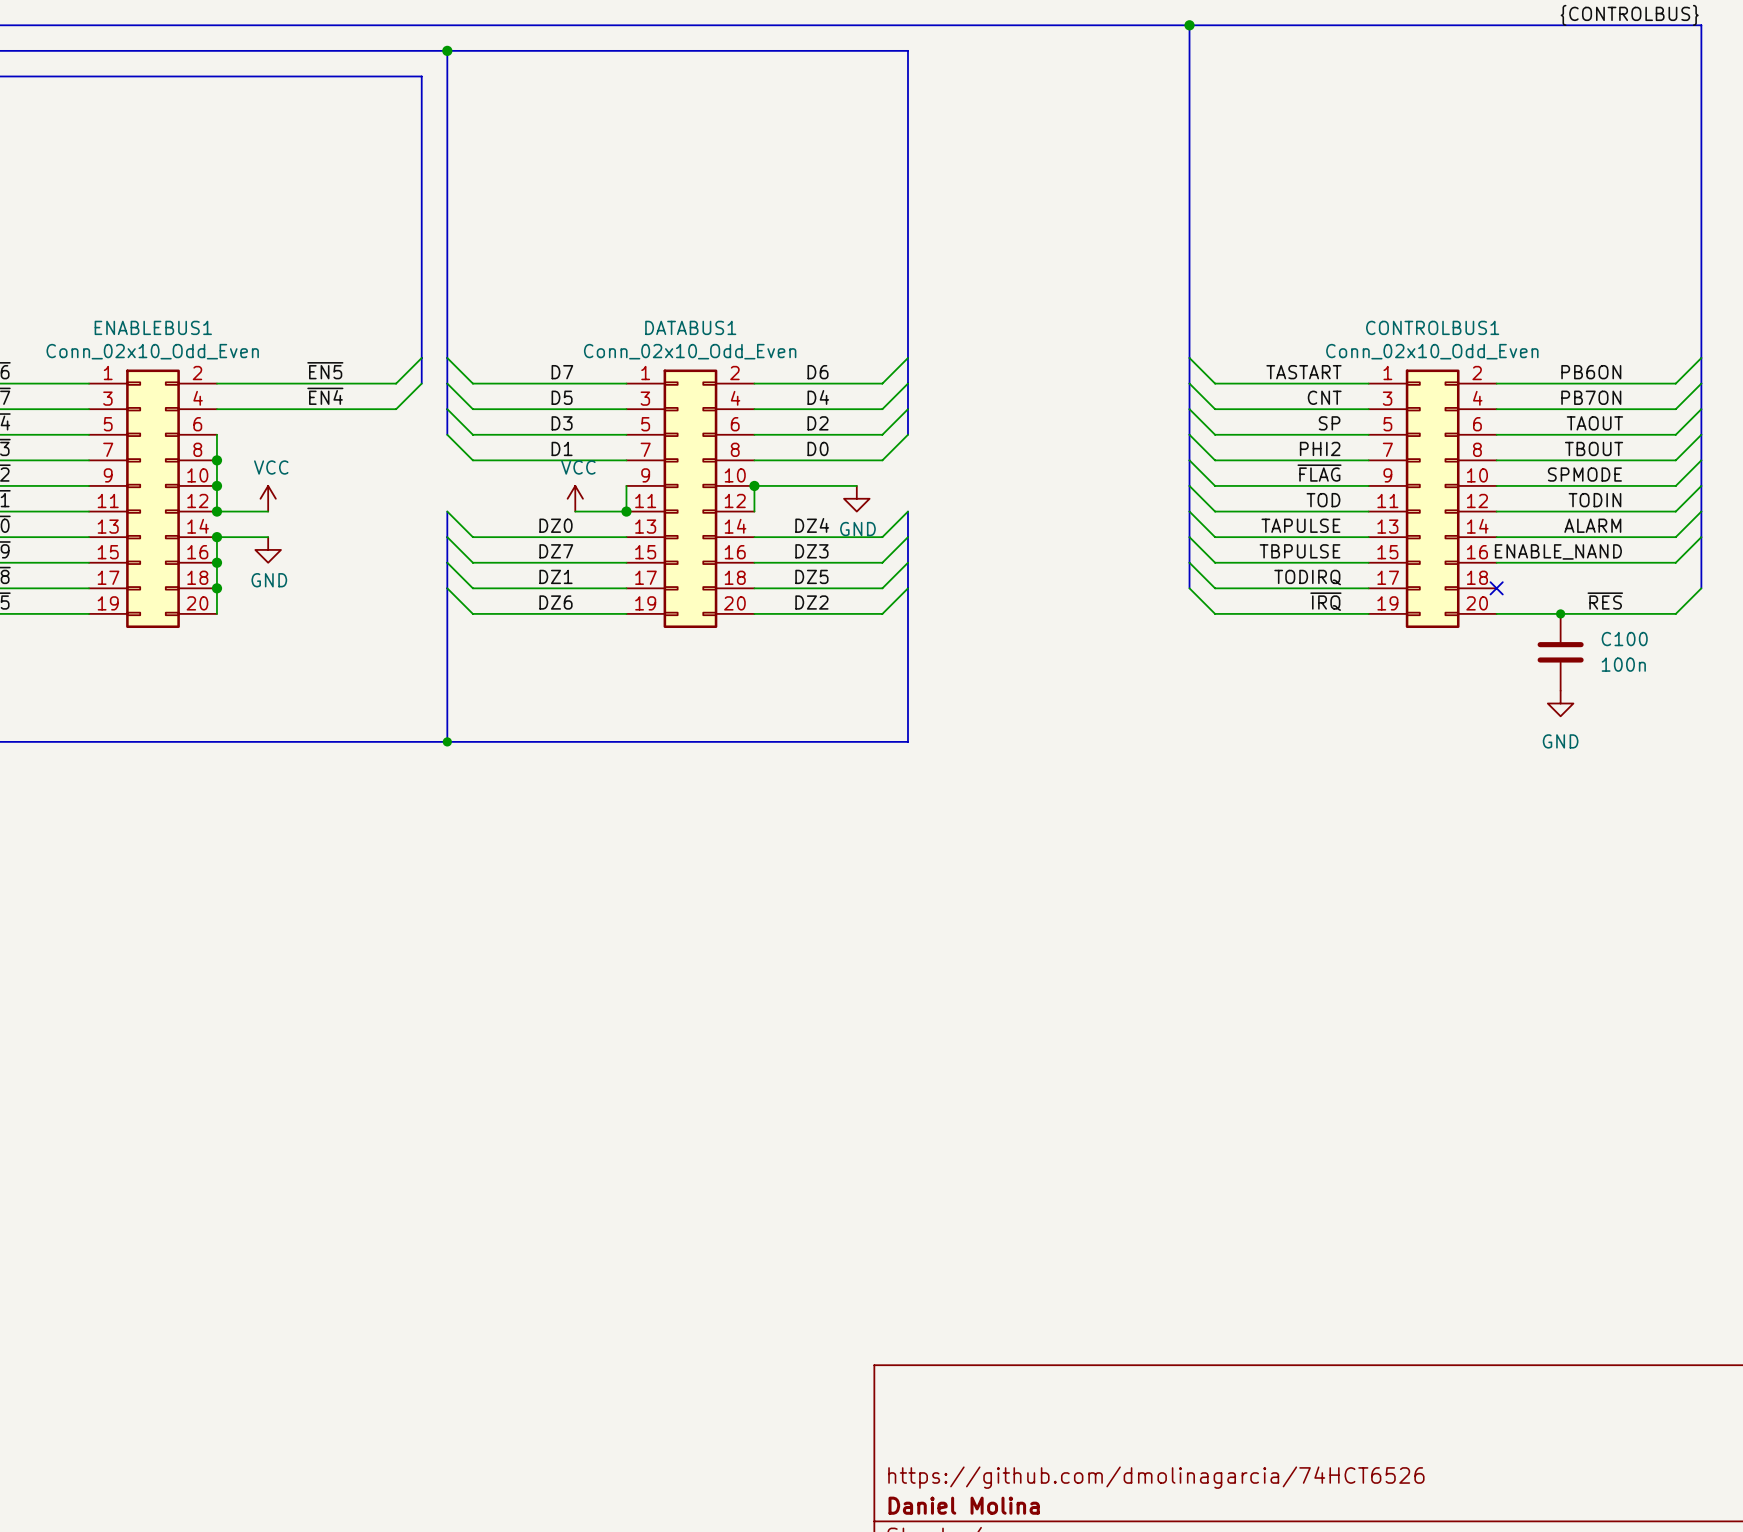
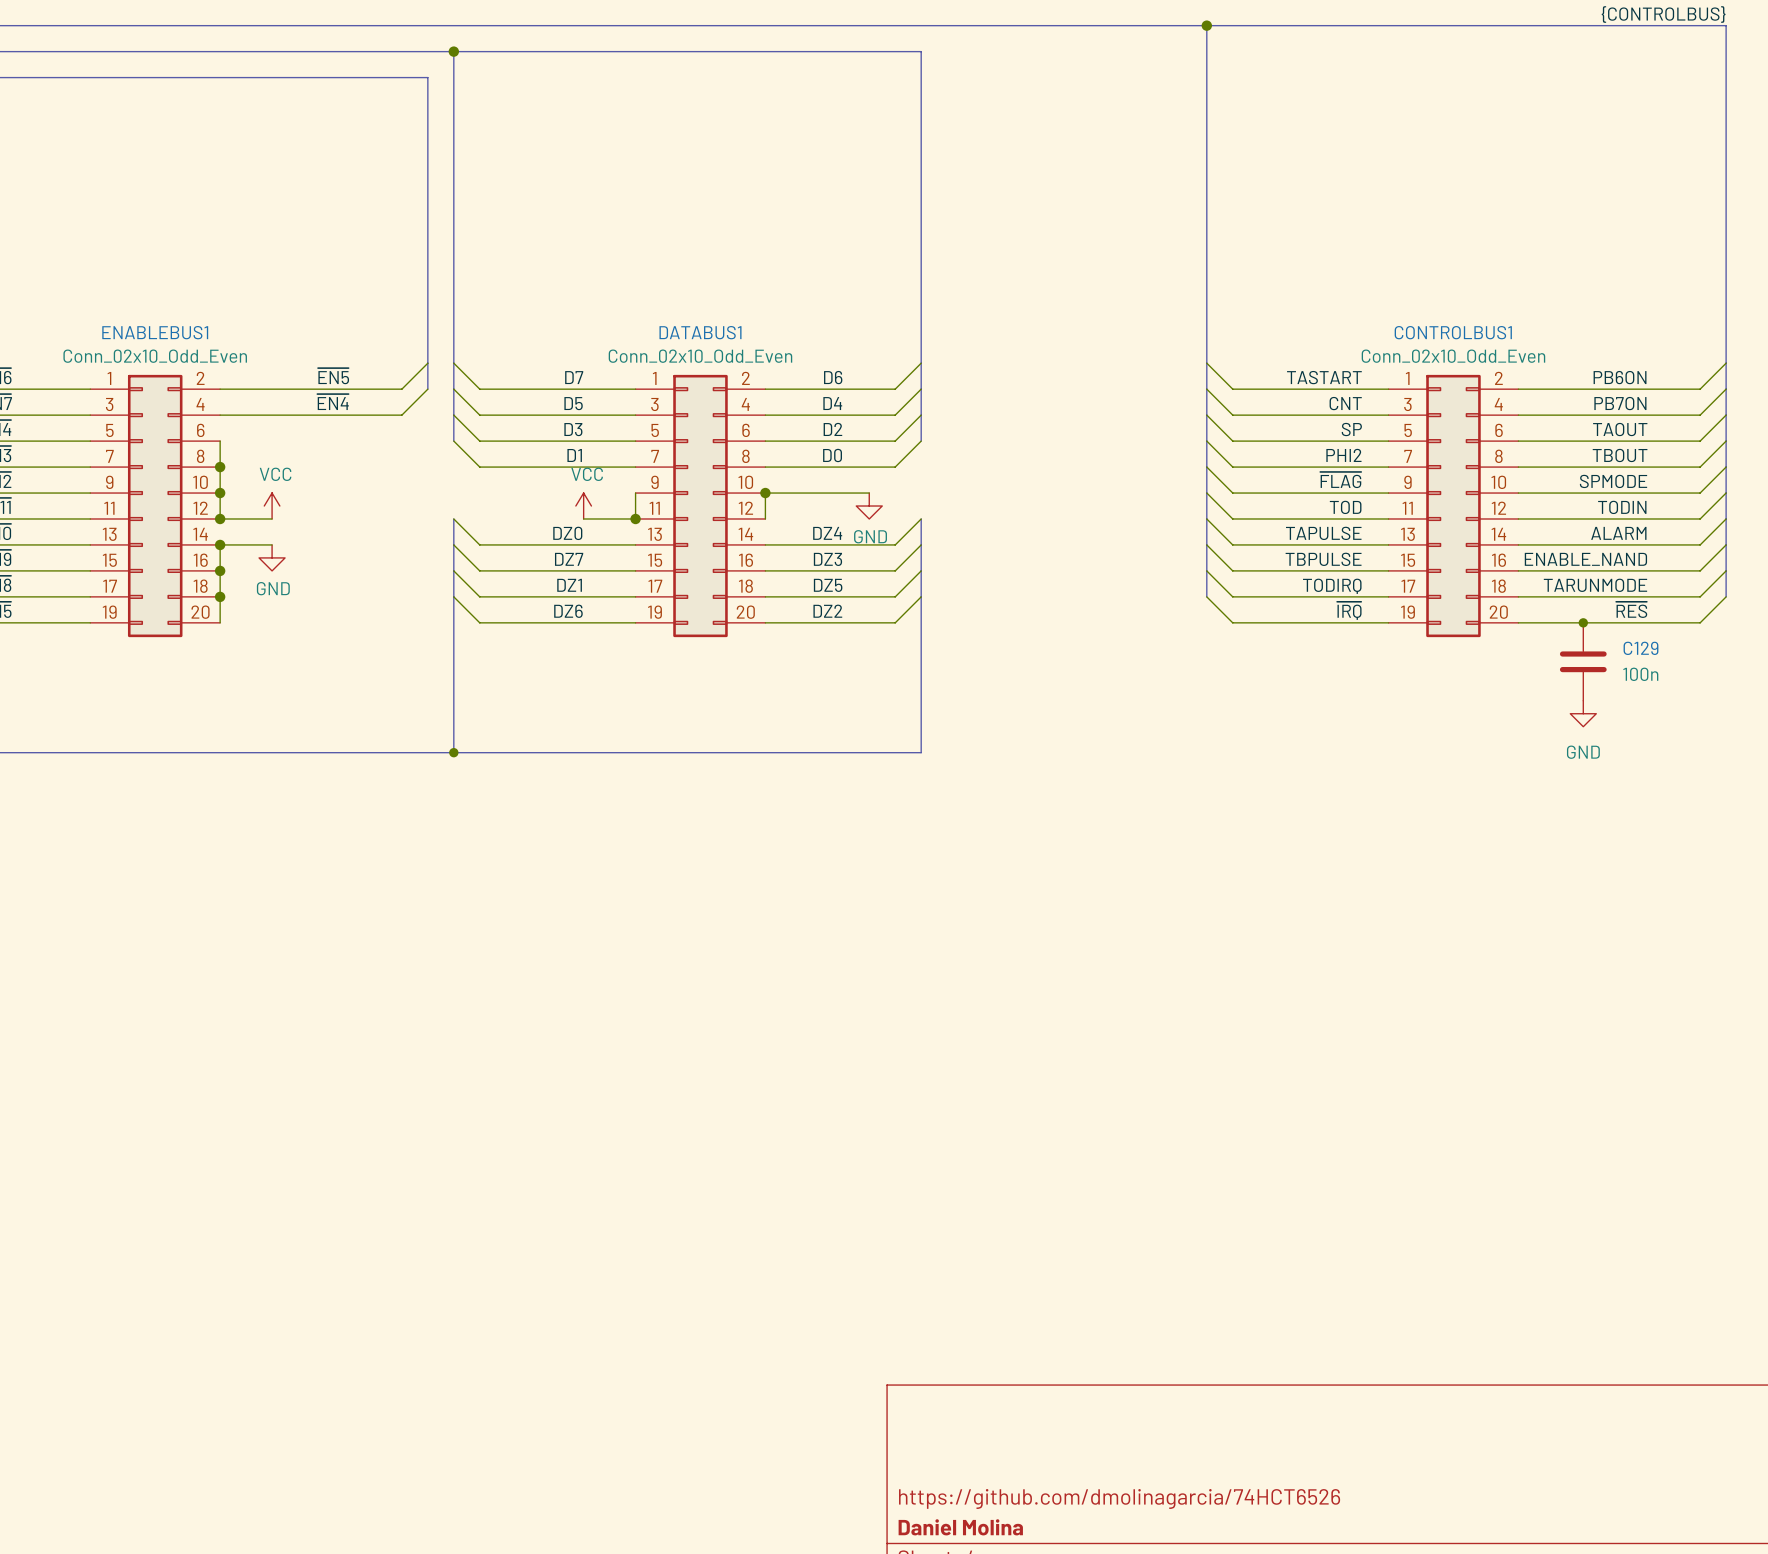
wire: none -> (1726, 570) (1700, 596) (1518, 596)
label: none -> TARUNMODE (1595, 585)
no-connect mark: (1496, 588) -> none
C100 name: C100 (1624, 639) -> C129 (1640, 648)

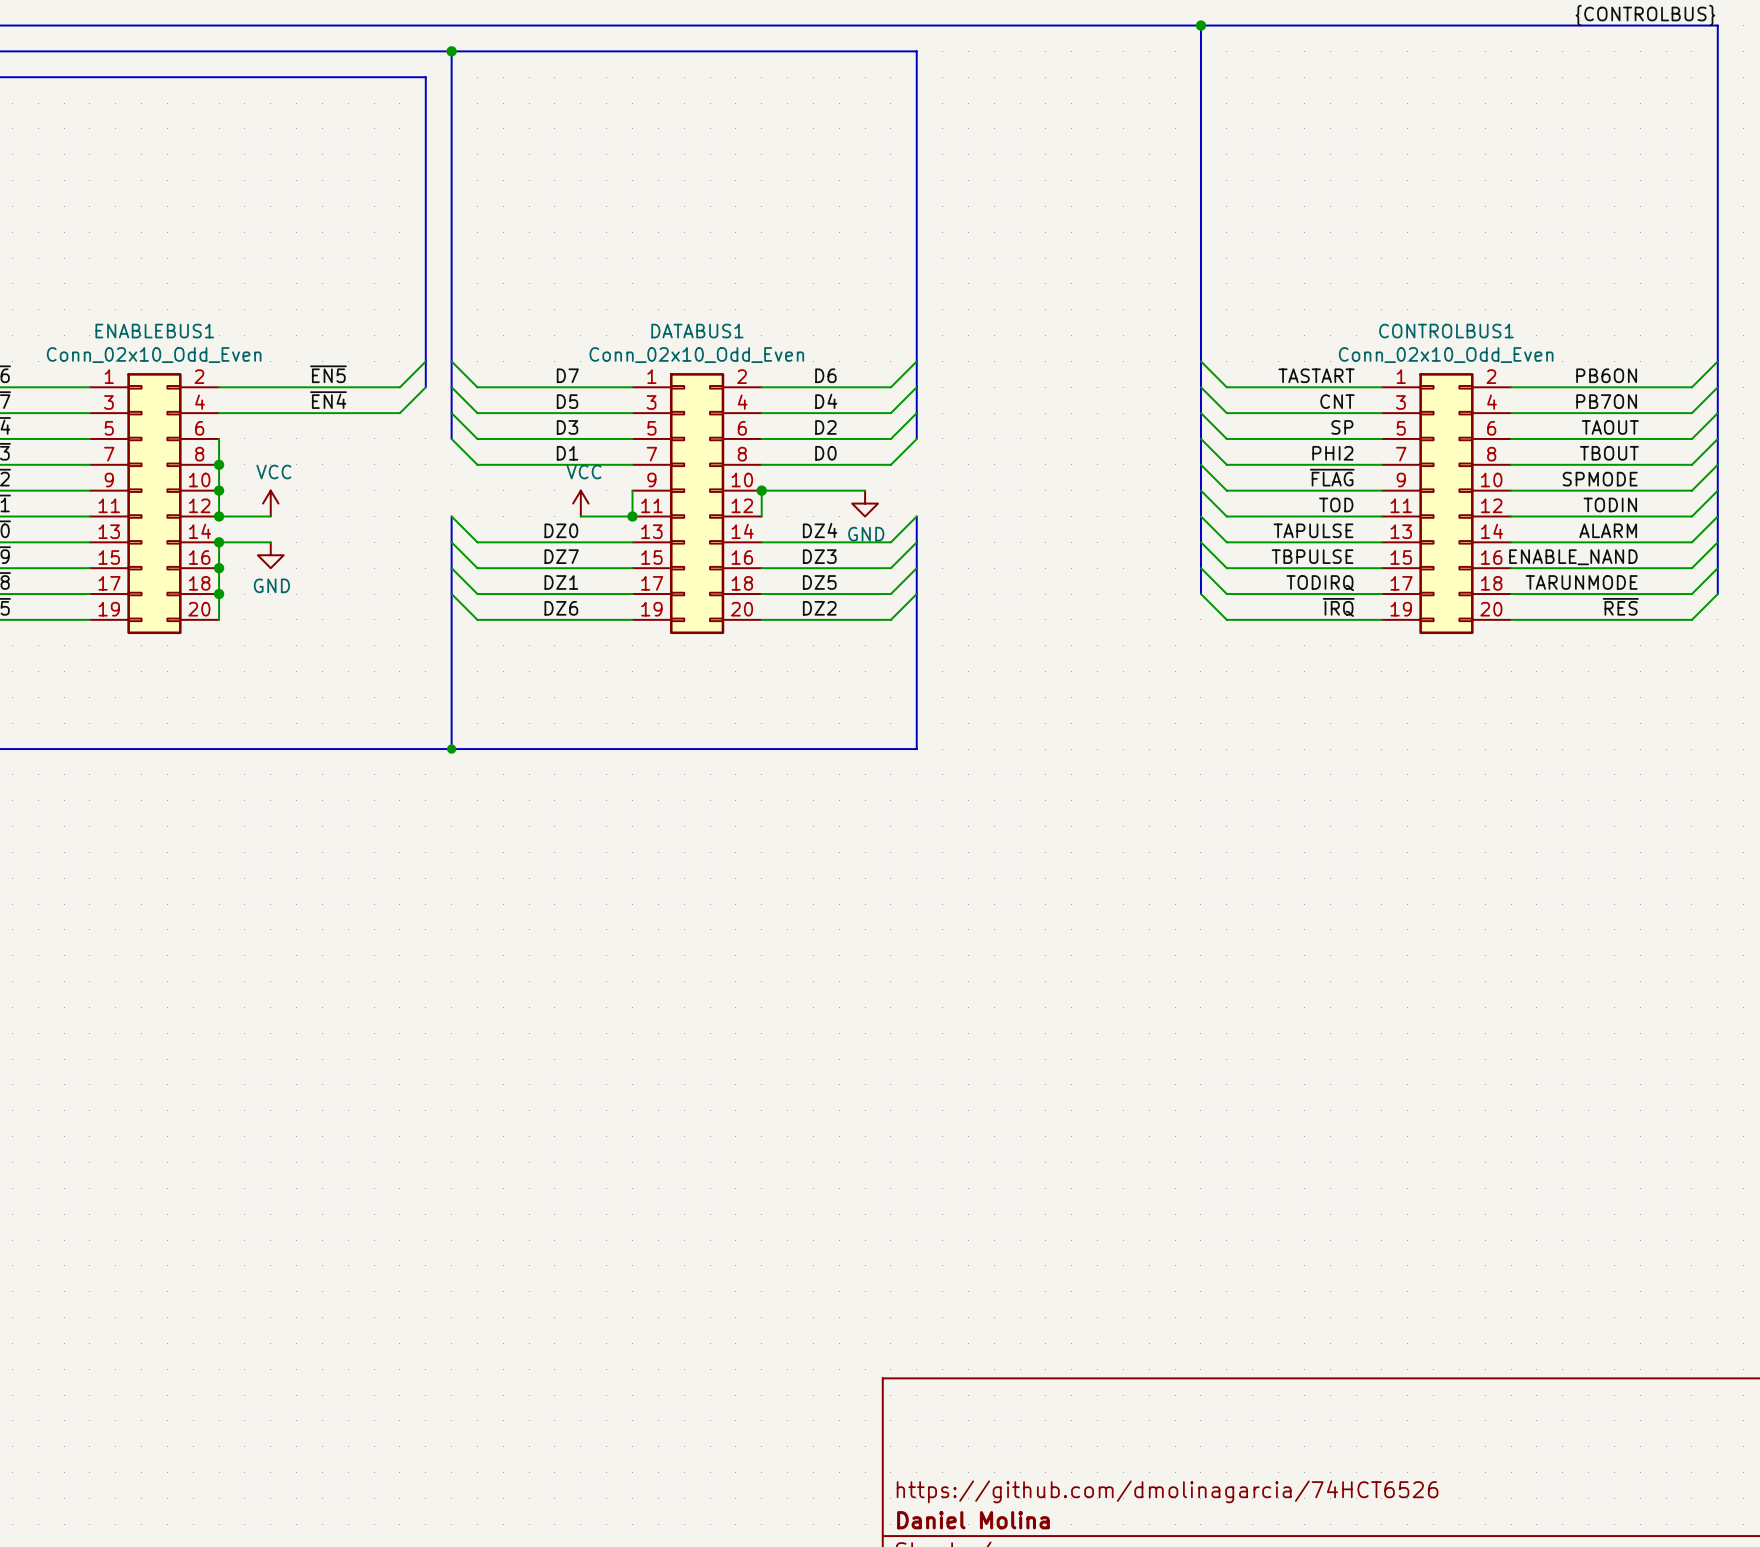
junction: (1583, 622) -> none
C129: 100n (1583, 661) -> none
power symbol: GND (1583, 713) -> none

